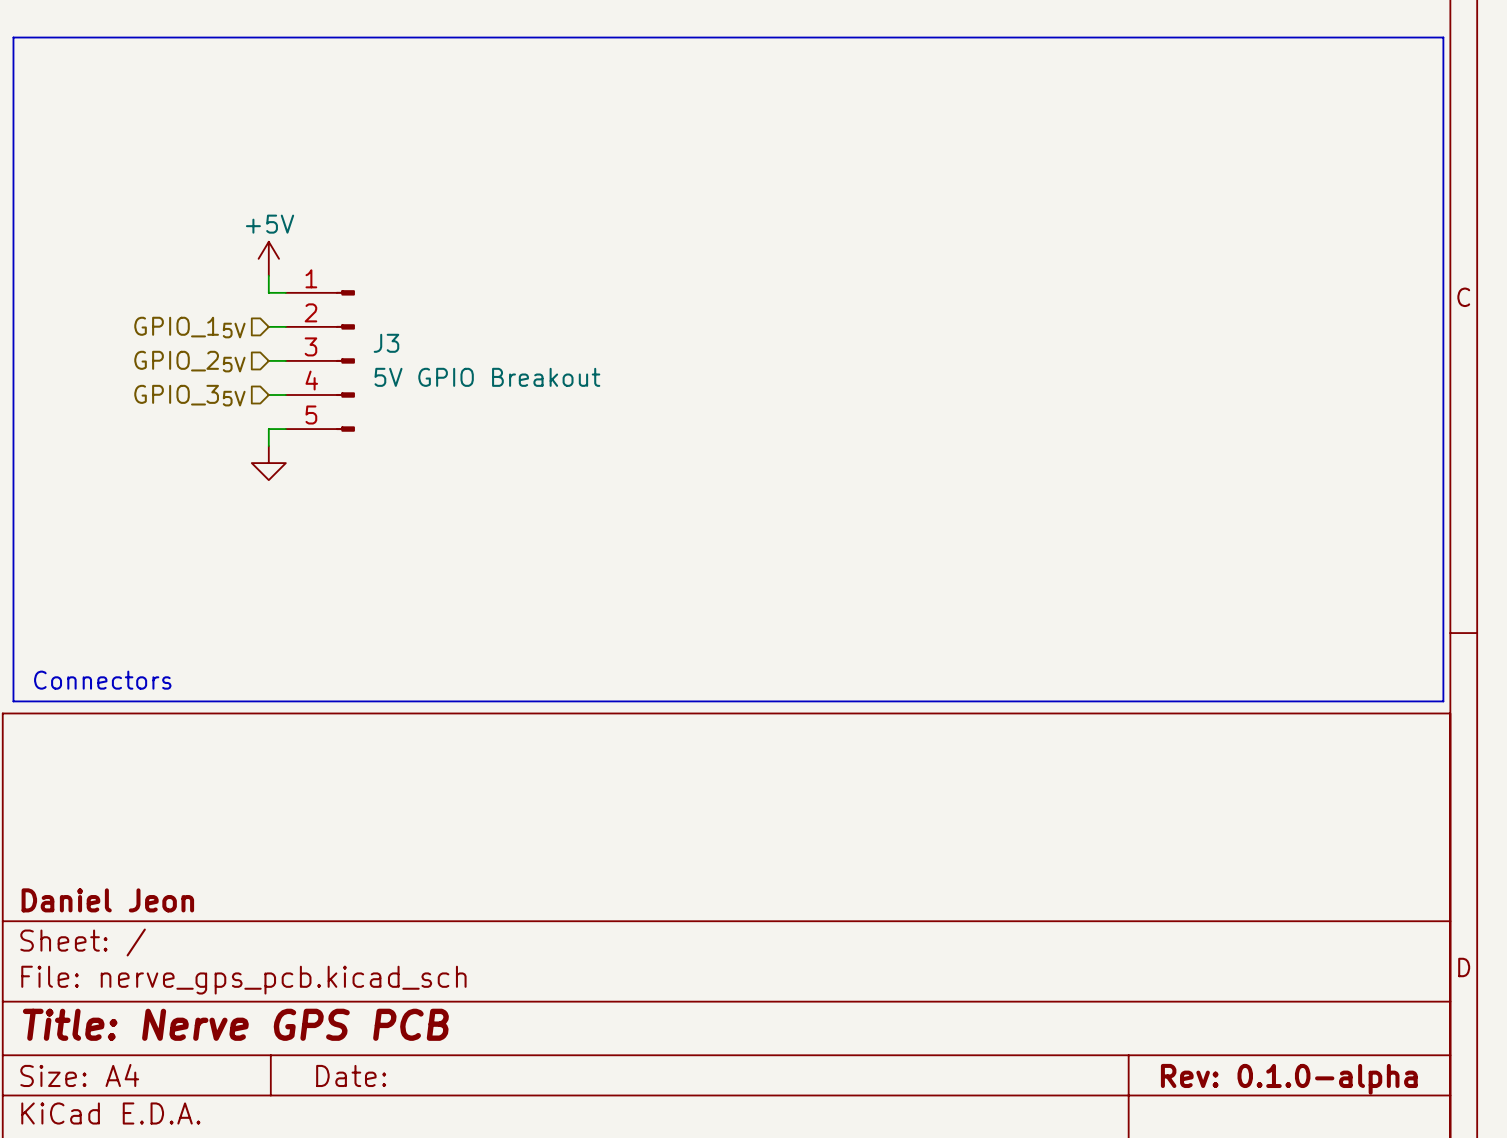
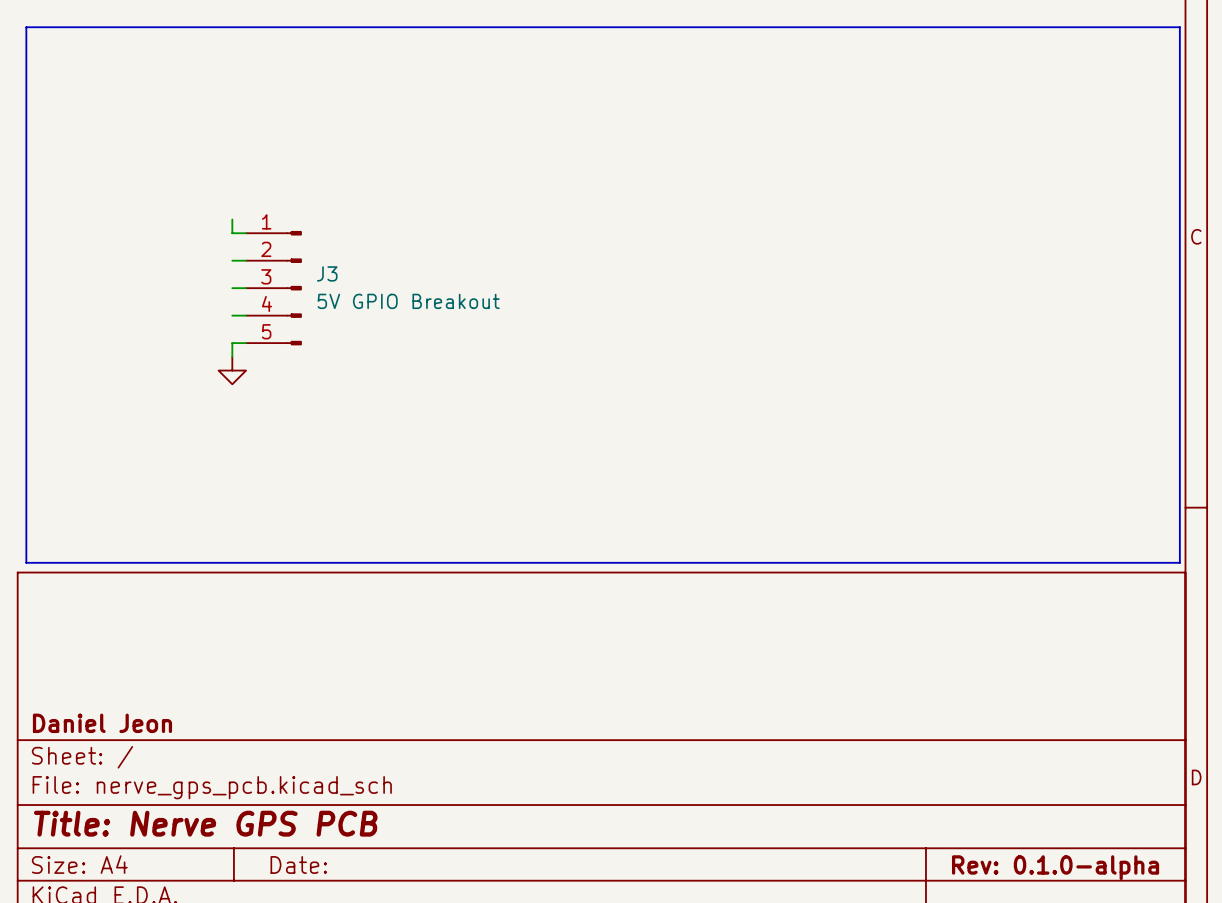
power symbol: +5V (268, 258) -> none
hierarchical label: GPIO_15V (189, 327) -> none
hierarchical label: GPIO_25V (189, 361) -> none
hierarchical label: GPIO_35V (189, 395) -> none
text: Connectors (102, 680) -> none

